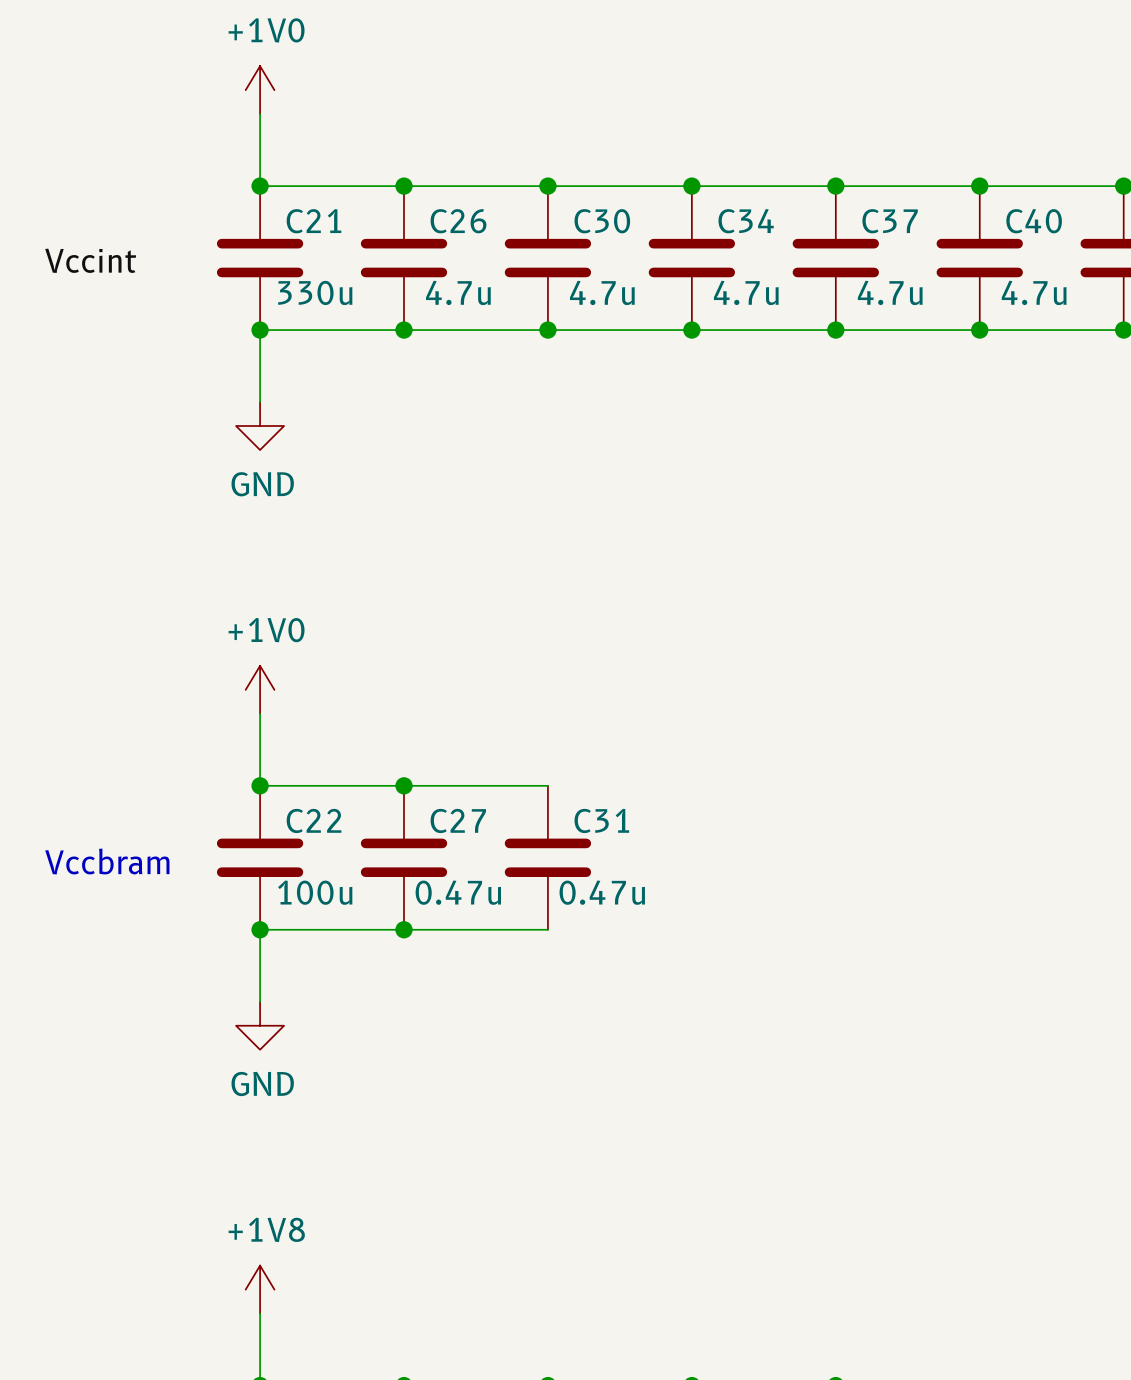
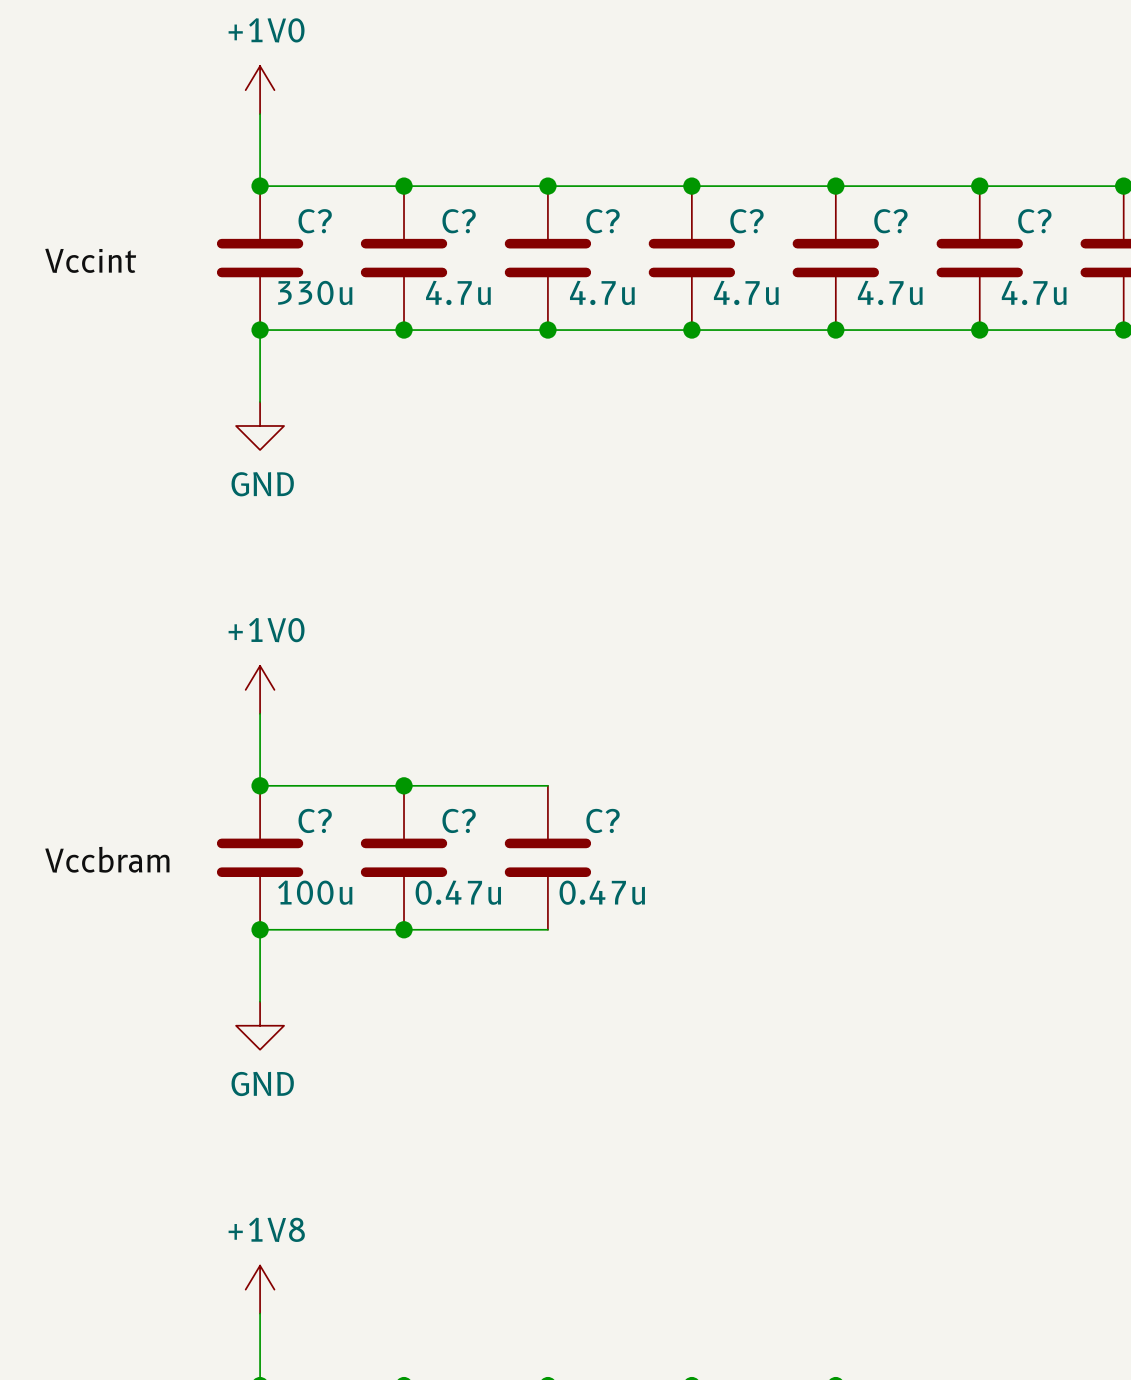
C21 name: C21 (313, 221) -> C? (315, 221)
C26 name: C26 (458, 221) -> C? (459, 221)
C30 name: C30 (602, 221) -> C? (603, 221)
C34 name: C34 (746, 221) -> C? (746, 221)
C37 name: C37 (890, 221) -> C? (890, 221)
C40 name: C40 (1034, 221) -> C? (1034, 221)
C22 name: C22 (314, 820) -> C? (315, 820)
C27 name: C27 (458, 820) -> C? (459, 820)
C31 name: C31 (601, 820) -> C? (603, 820)
label: none -> Vccbram (107, 859)
text: Vccbram (107, 861) -> none

